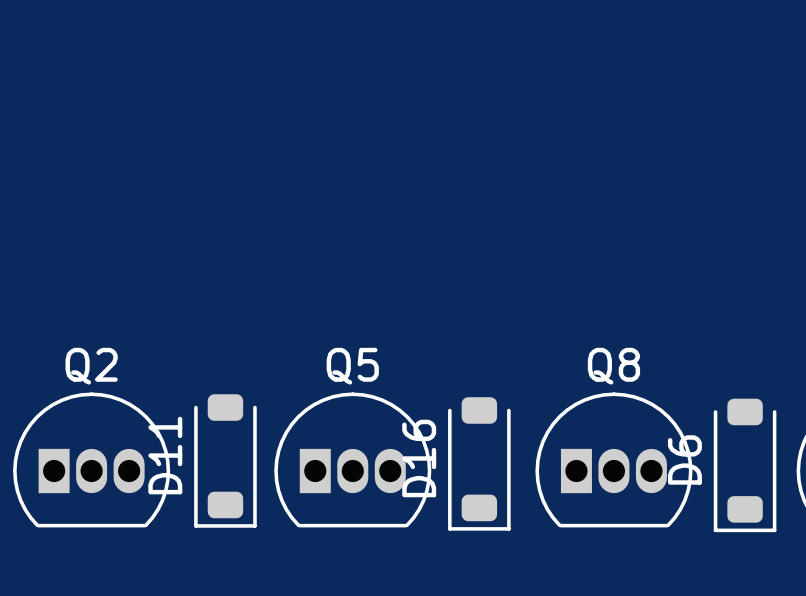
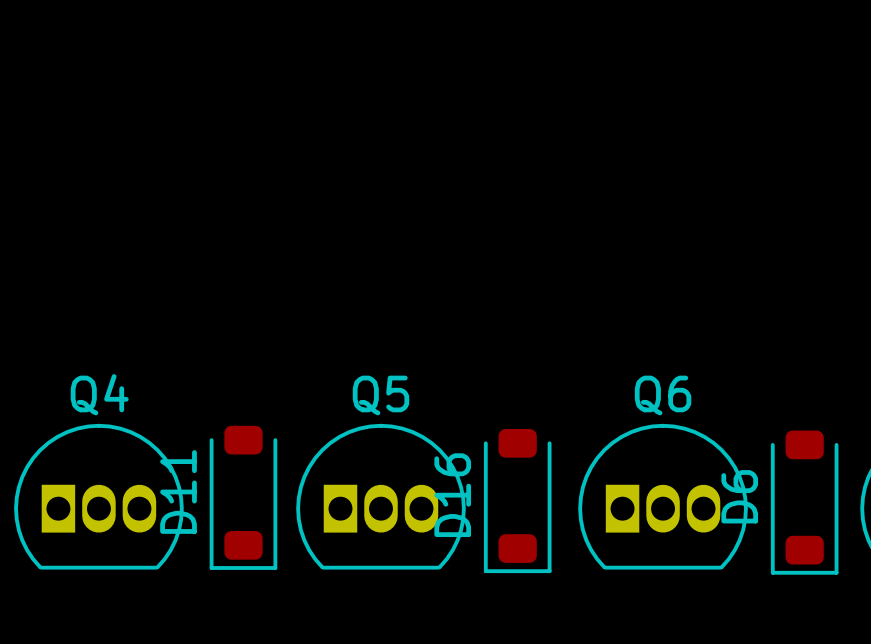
Q2 name: Q2 (91, 366) -> Q4 (99, 394)
Q8 name: Q8 (613, 366) -> Q6 (663, 395)

